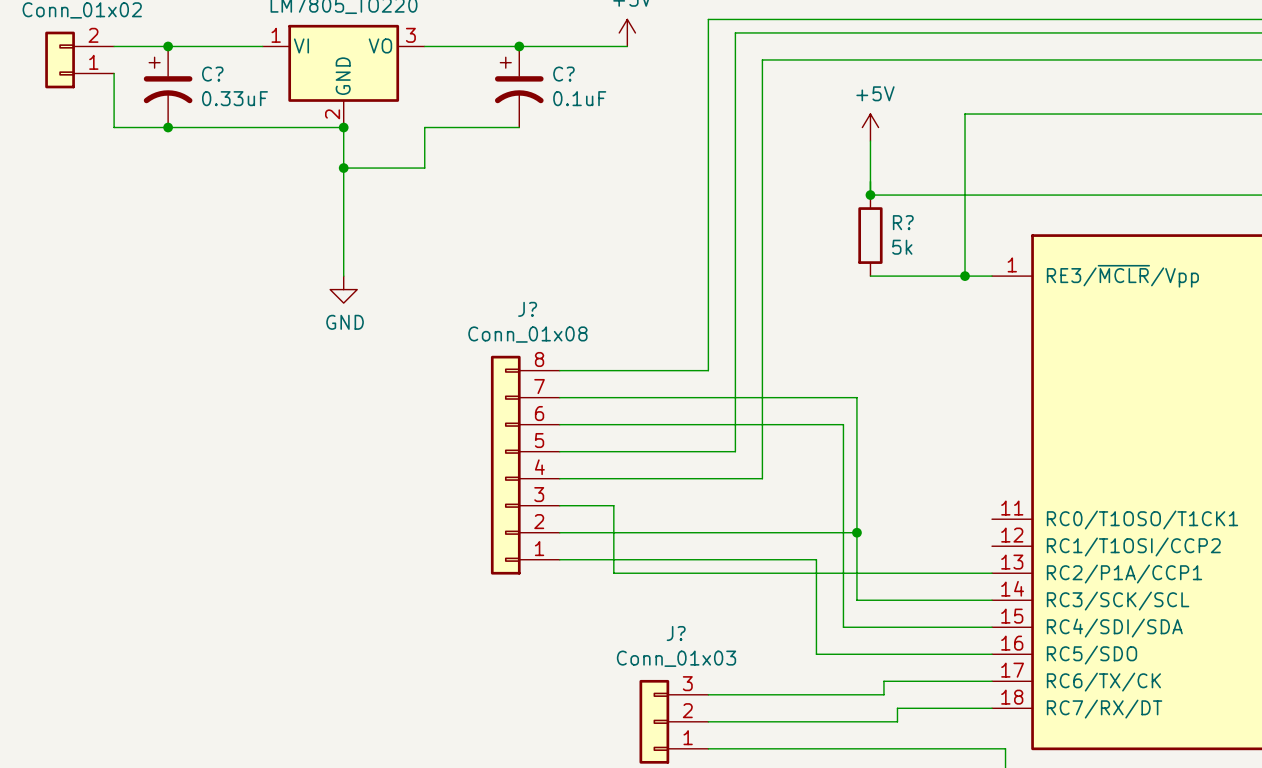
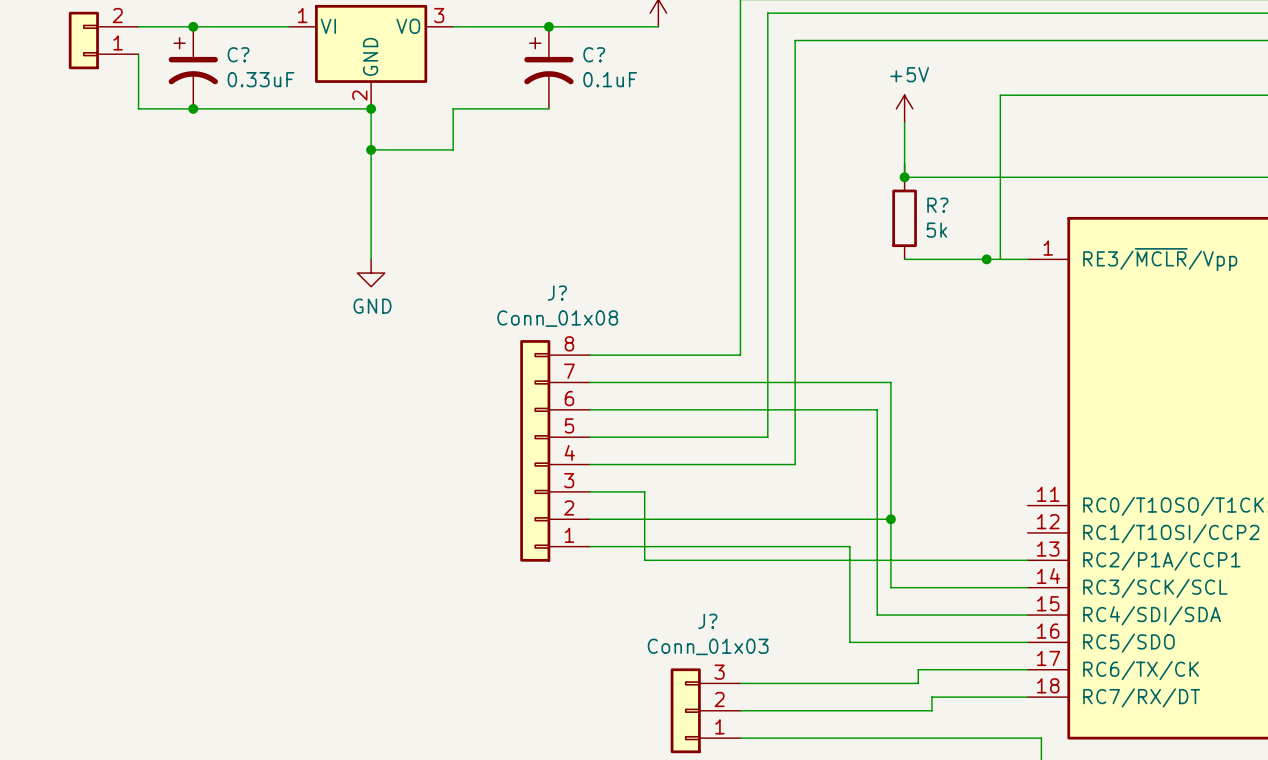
junction position: (965, 276) -> (986, 259)

